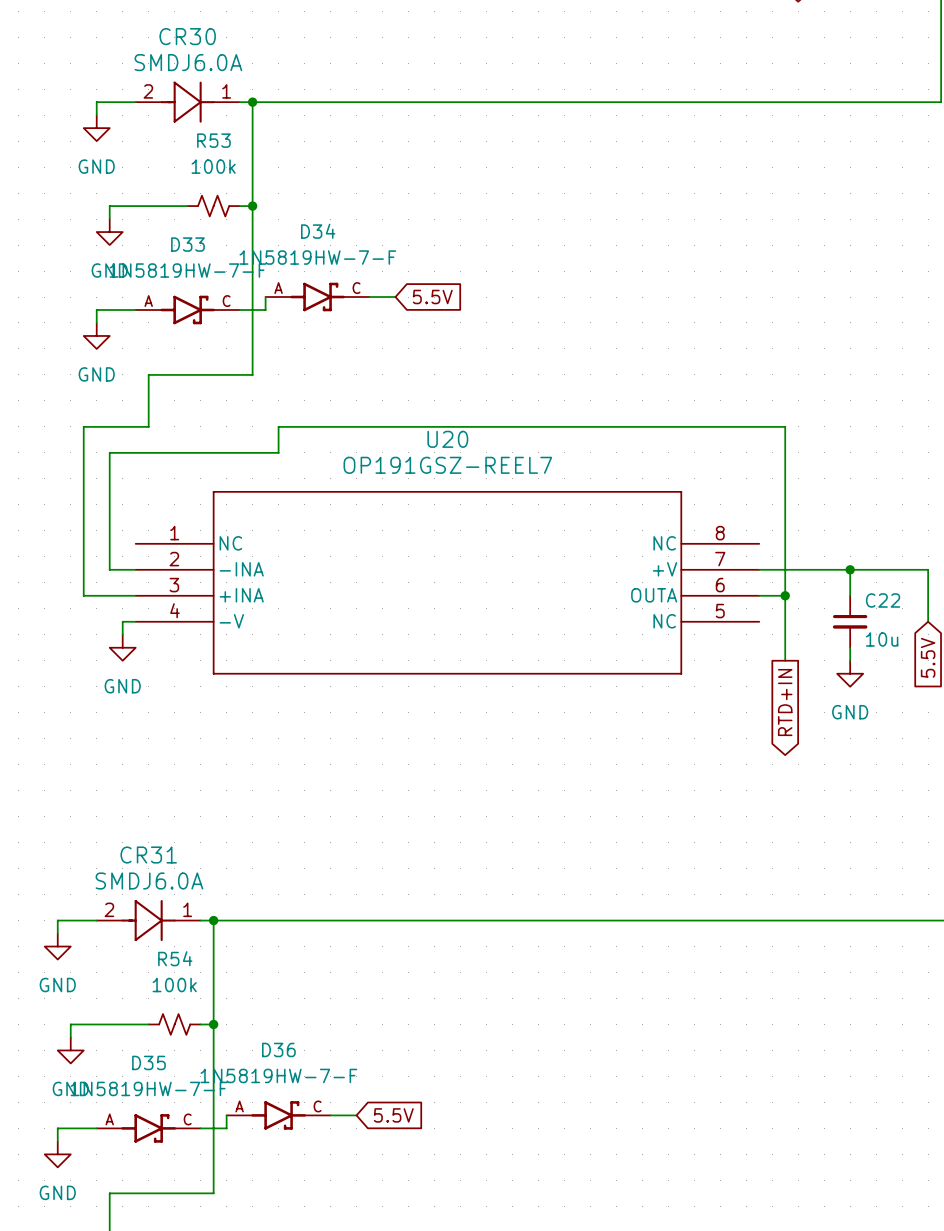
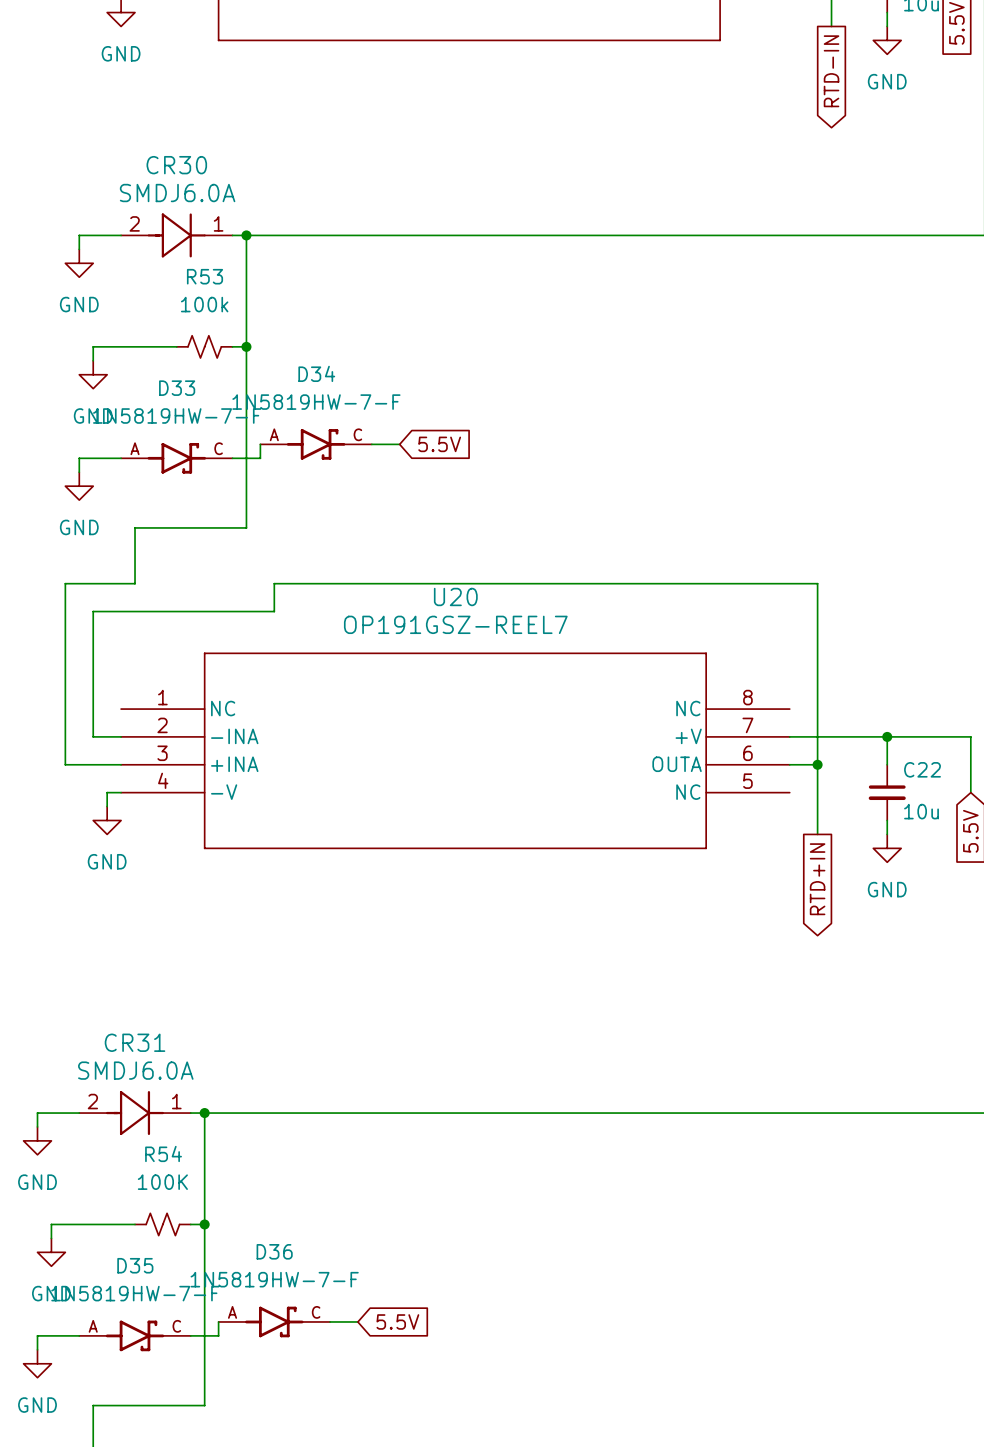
R54 value: 100k (174, 985) -> 100K (162, 1182)

